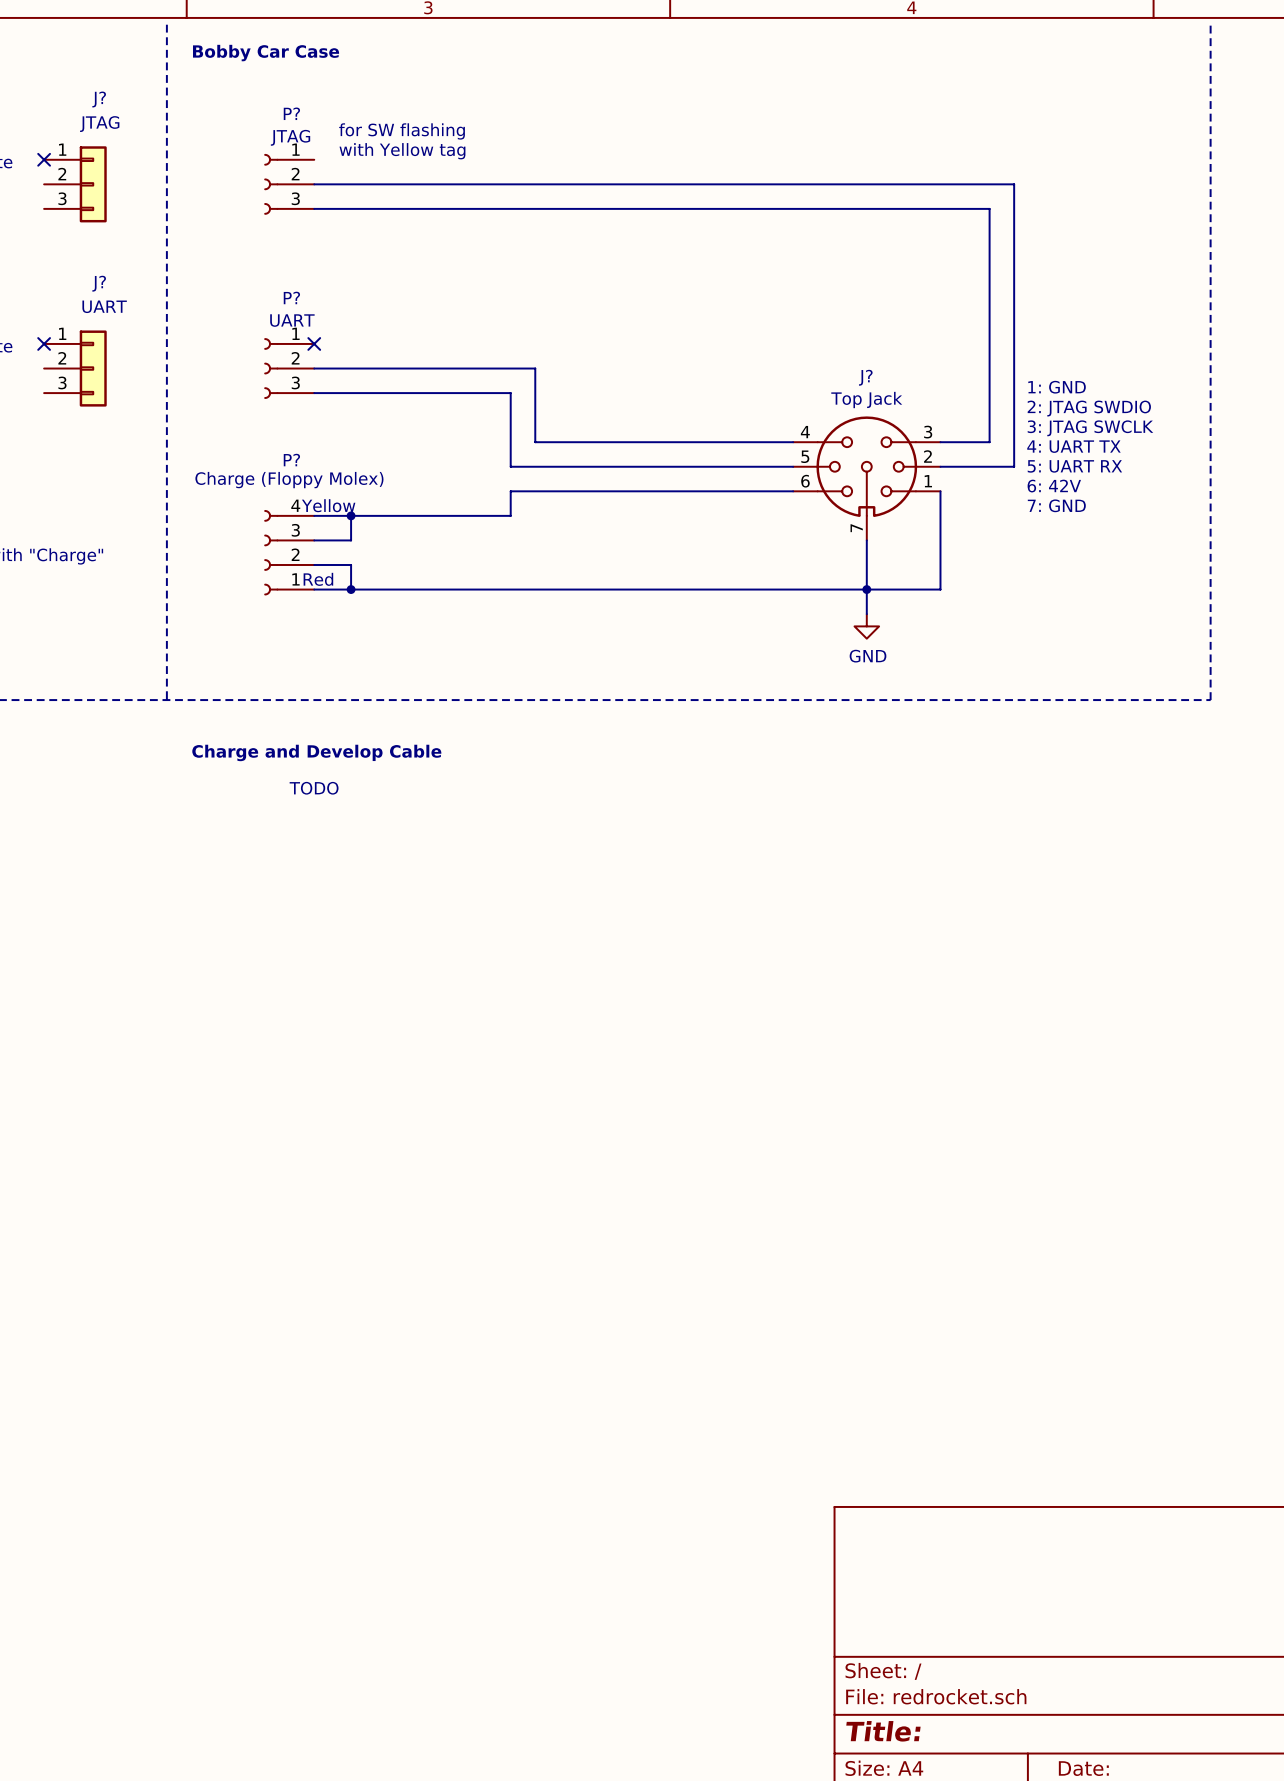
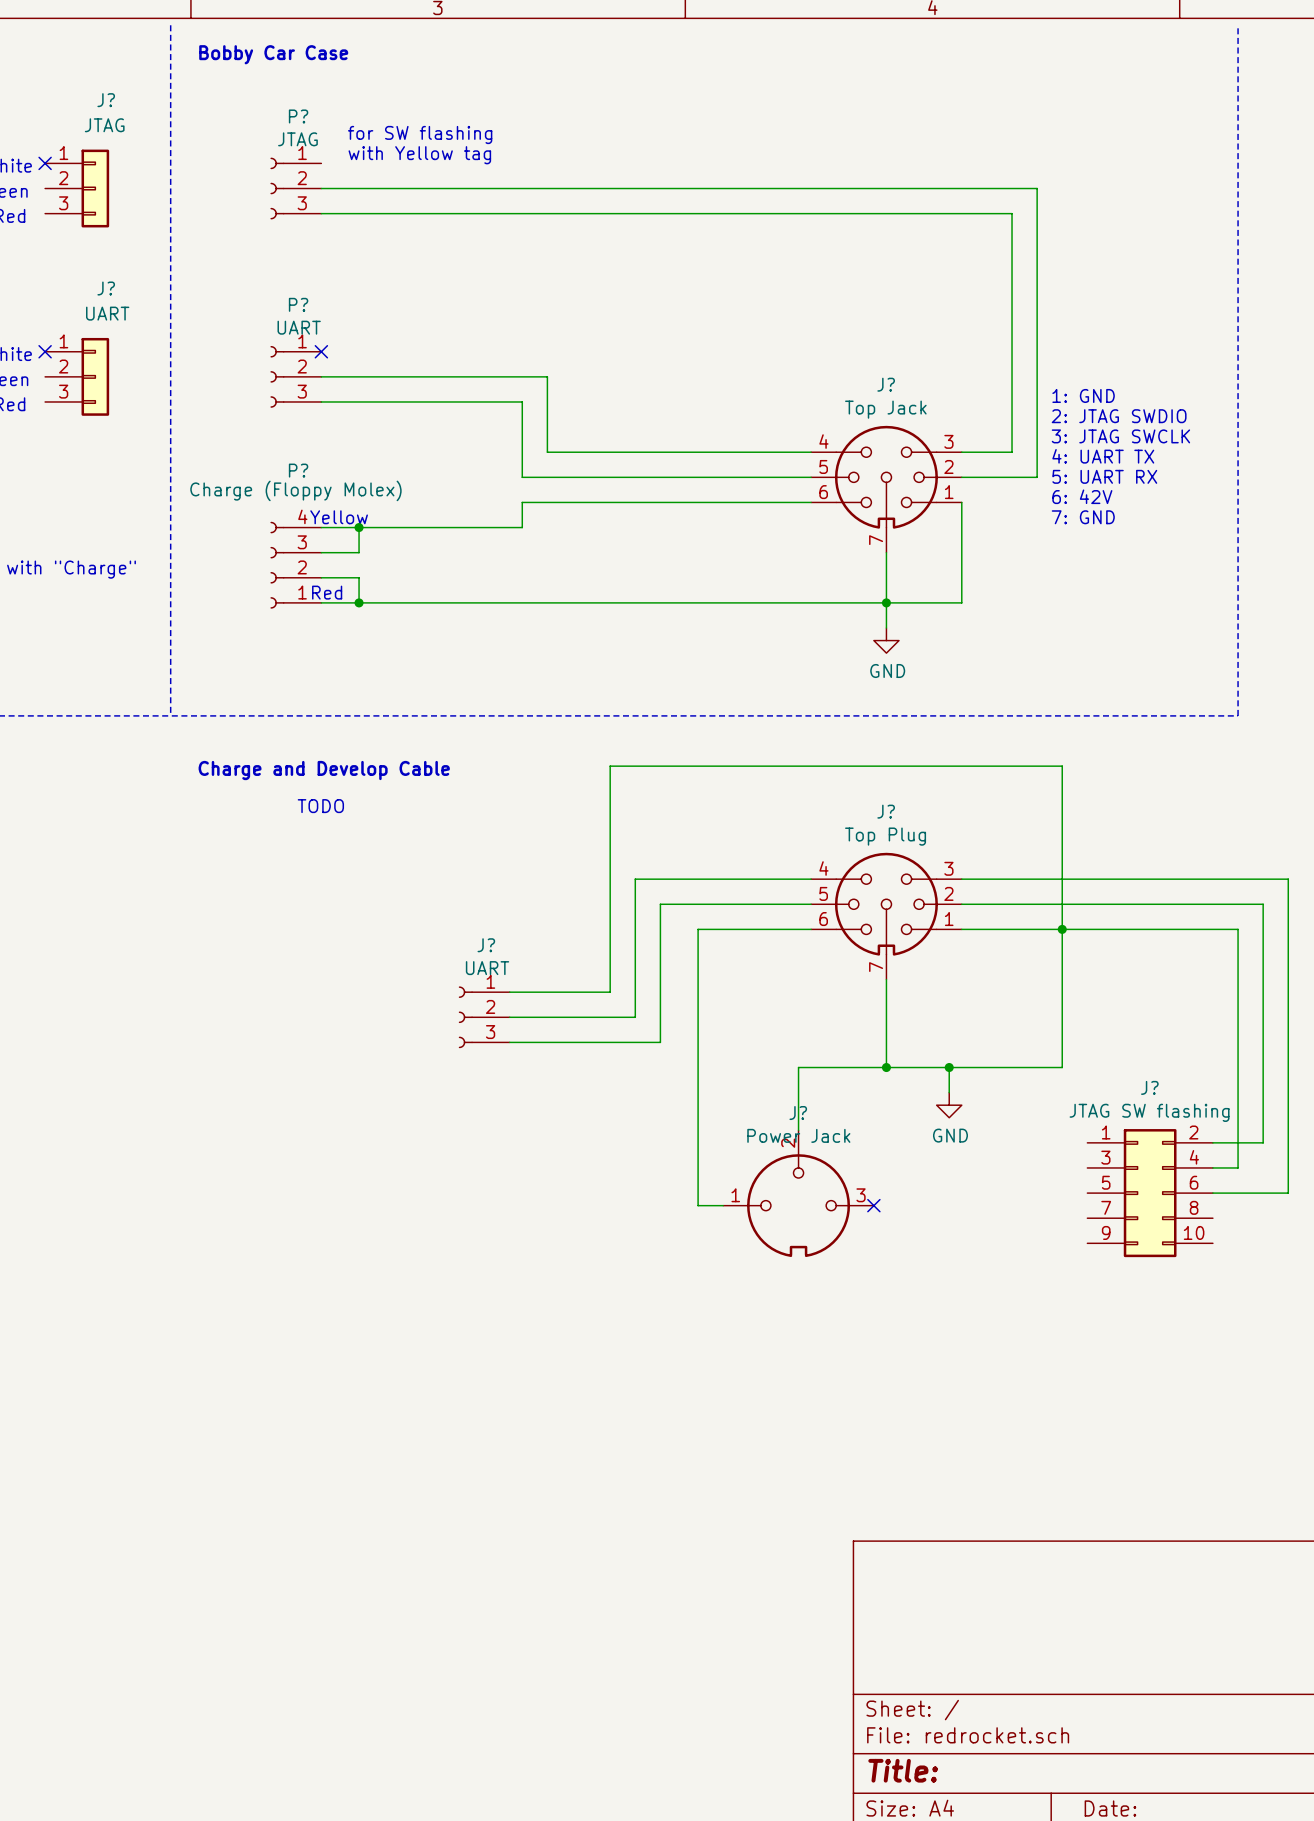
wire: none -> (811, 879) (635, 879) (635, 1017) (509, 1017)
wire: none -> (961, 879) (1288, 879) (1288, 1193) (1212, 1193)
wire: none -> (811, 904) (660, 904) (660, 1042) (509, 1042)
wire: none -> (961, 904) (1263, 904) (1263, 1142) (1212, 1142)
J?: none -> Top Plug (886, 916)
wire: none -> (811, 929) (698, 929) (698, 1205) (723, 1205)
wire: none -> (961, 929) (1238, 929) (1238, 1167) (1212, 1167)
junction: none -> (1062, 929)
wire: none -> (886, 979) (886, 1067)
wire: none -> (509, 992) (610, 992) (610, 766) (1062, 766) (1062, 1067) (798, 1067) (798, 1130)
J?: none -> UART (484, 1017)
junction: none -> (886, 1067)
wire: none -> (949, 1067) (949, 1092)
junction: none -> (949, 1067)
power symbol: none -> GND (949, 1105)
J?: none -> JTAG SW flashing (1150, 1193)
J?: none -> Power Jack (798, 1193)
no-connect mark: none -> (873, 1205)

